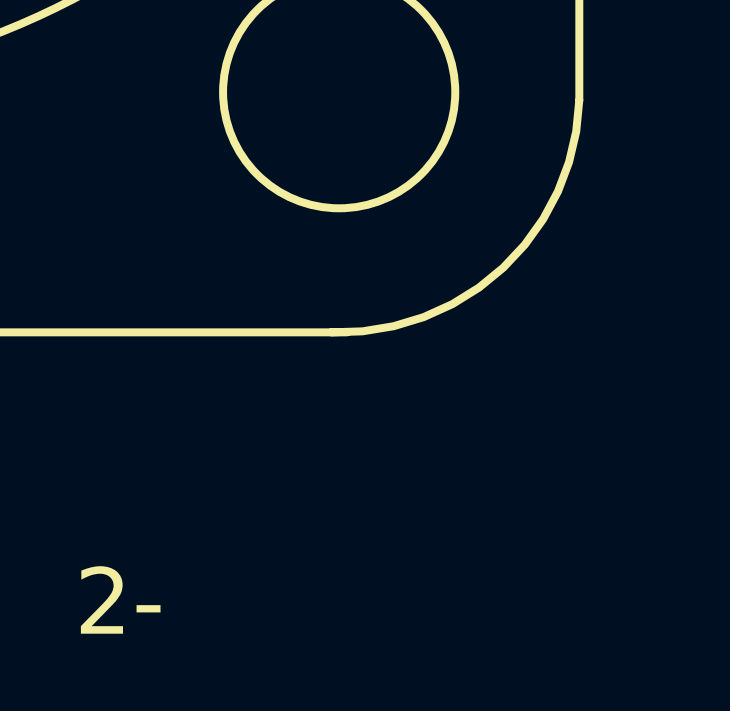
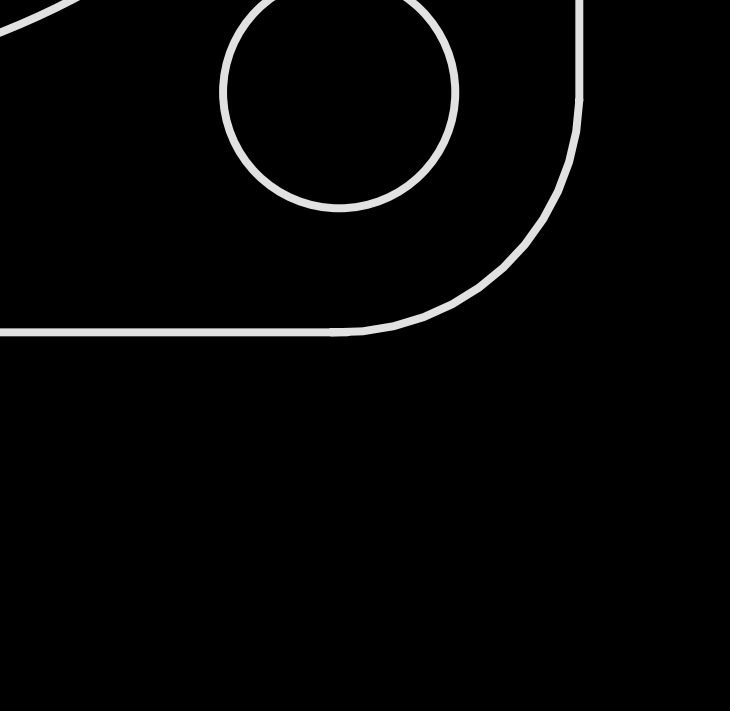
text: 2- (120, 599) -> none

